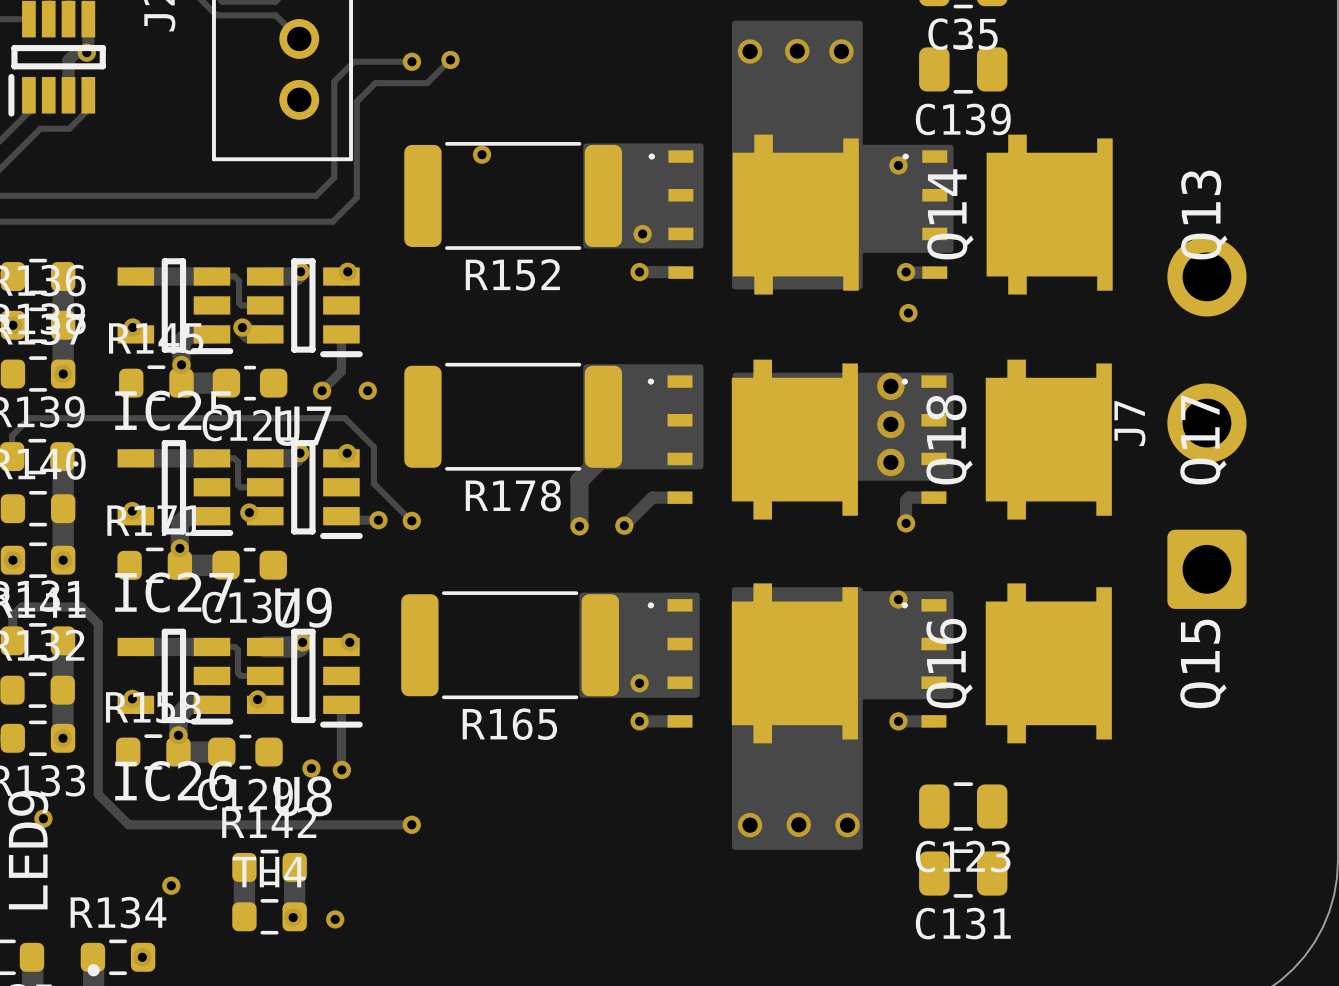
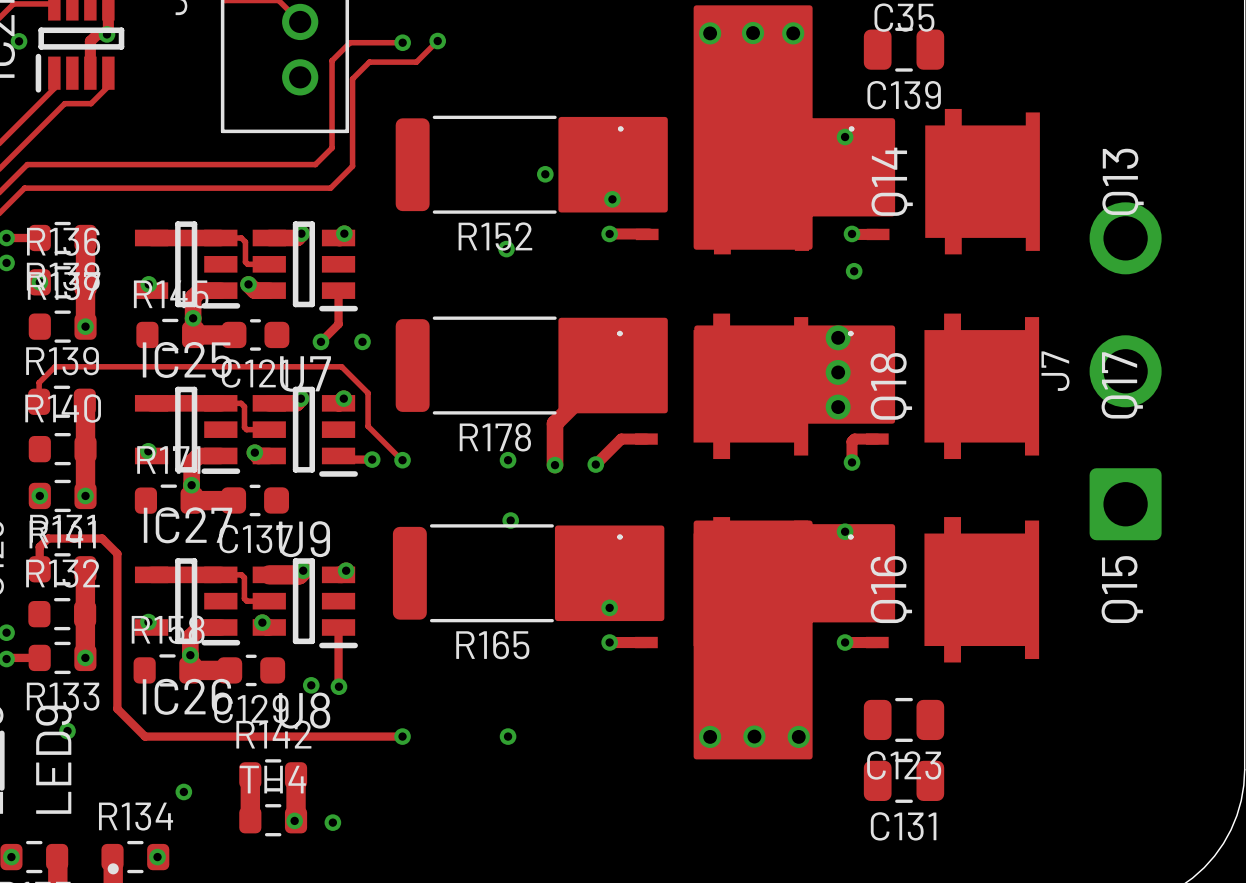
via: (482, 154) -> none
via: none -> (545, 174)
via: none -> (506, 249)
via: none -> (508, 460)
via: none -> (510, 520)
via: none -> (508, 736)

